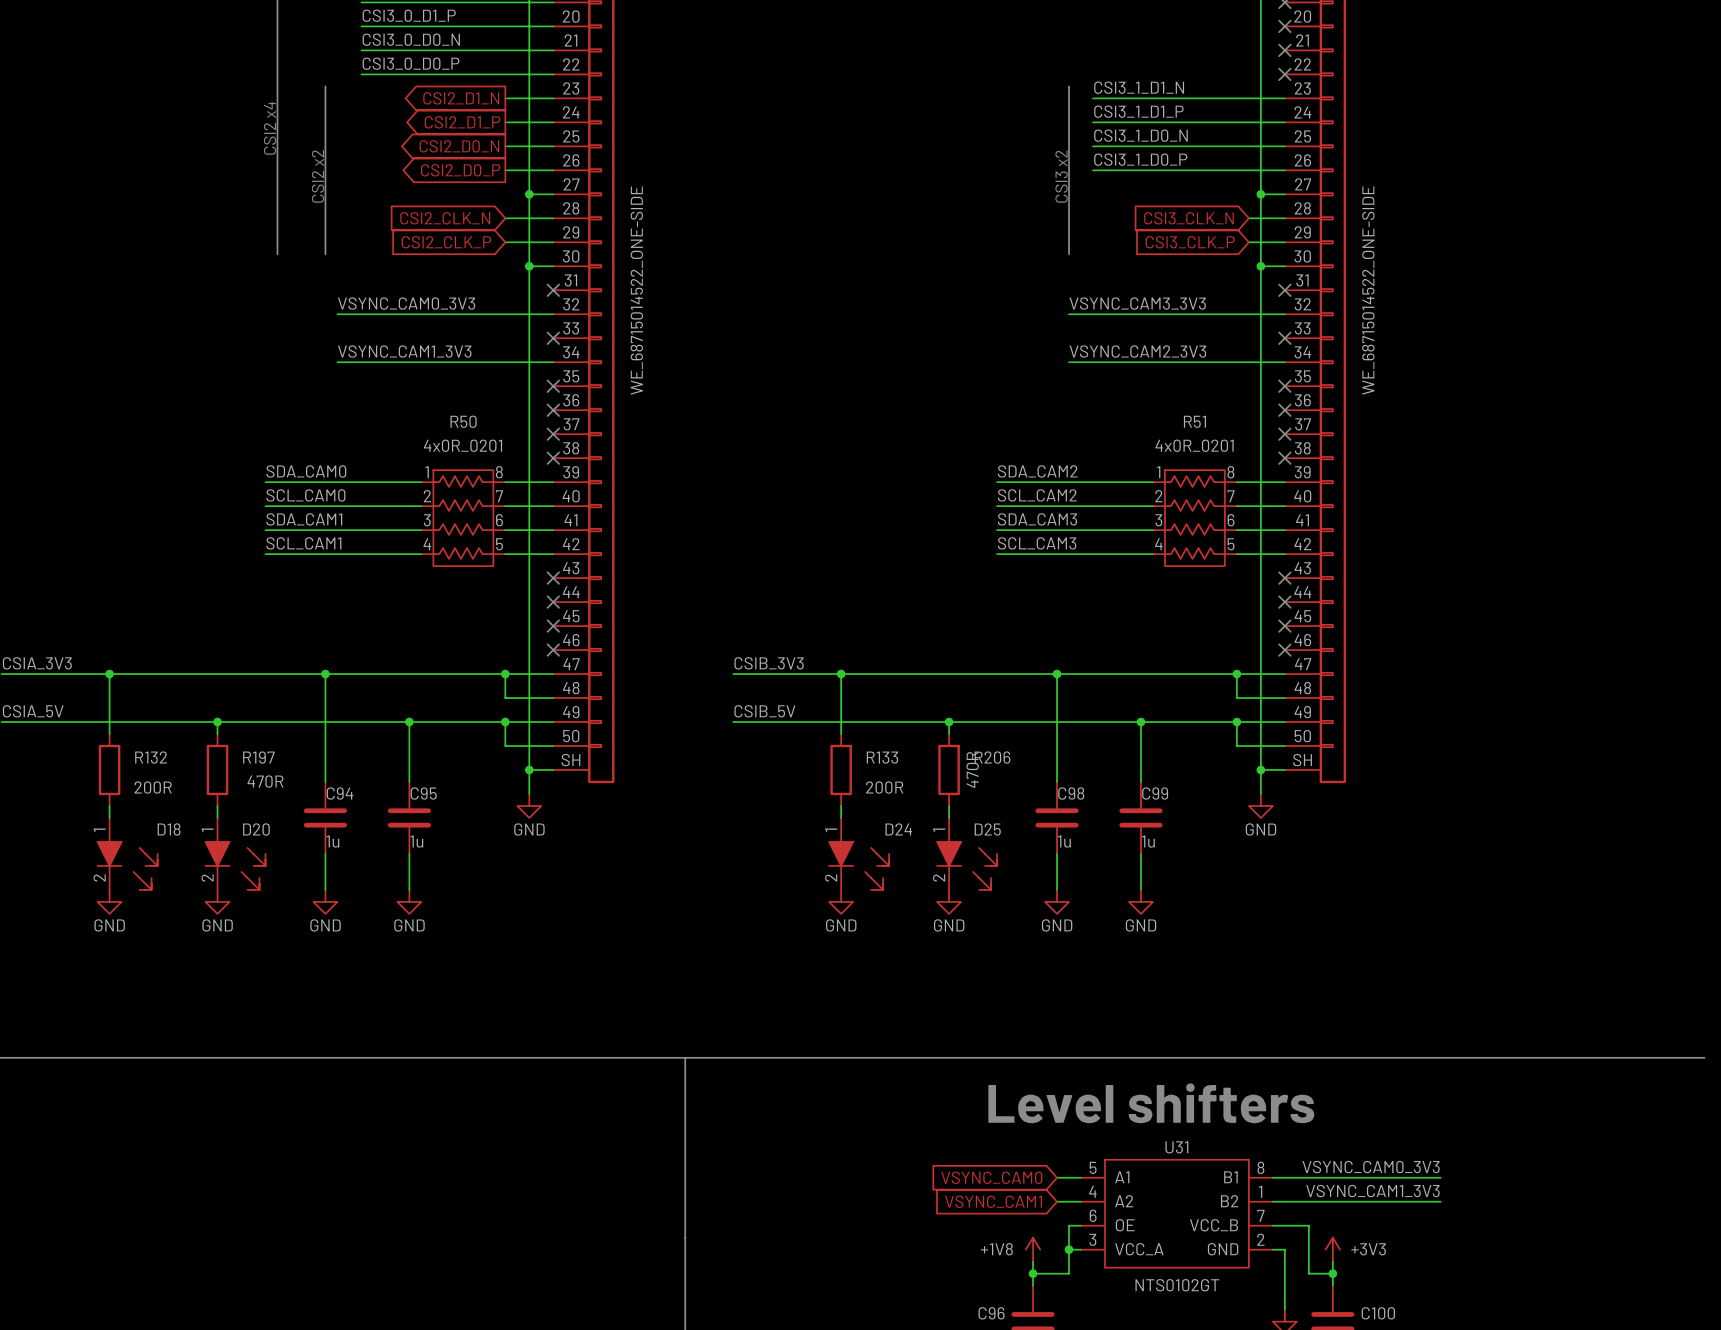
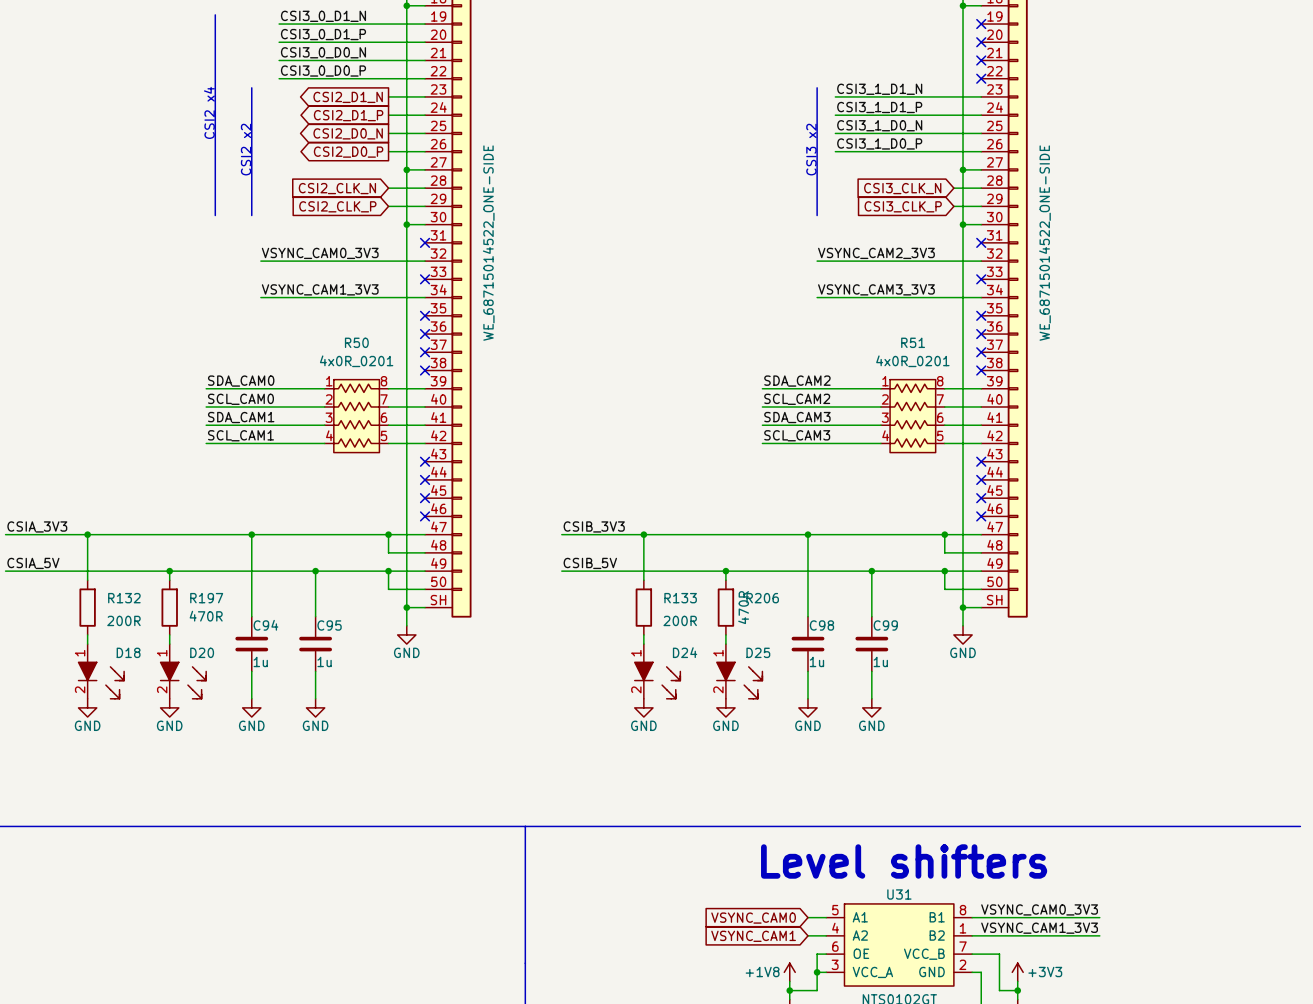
label: VSYNC_CAM3_3V3 (1137, 303) -> VSYNC_CAM2_3V3 (876, 253)
label: VSYNC_CAM2_3V3 (1137, 351) -> VSYNC_CAM3_3V3 (876, 289)

